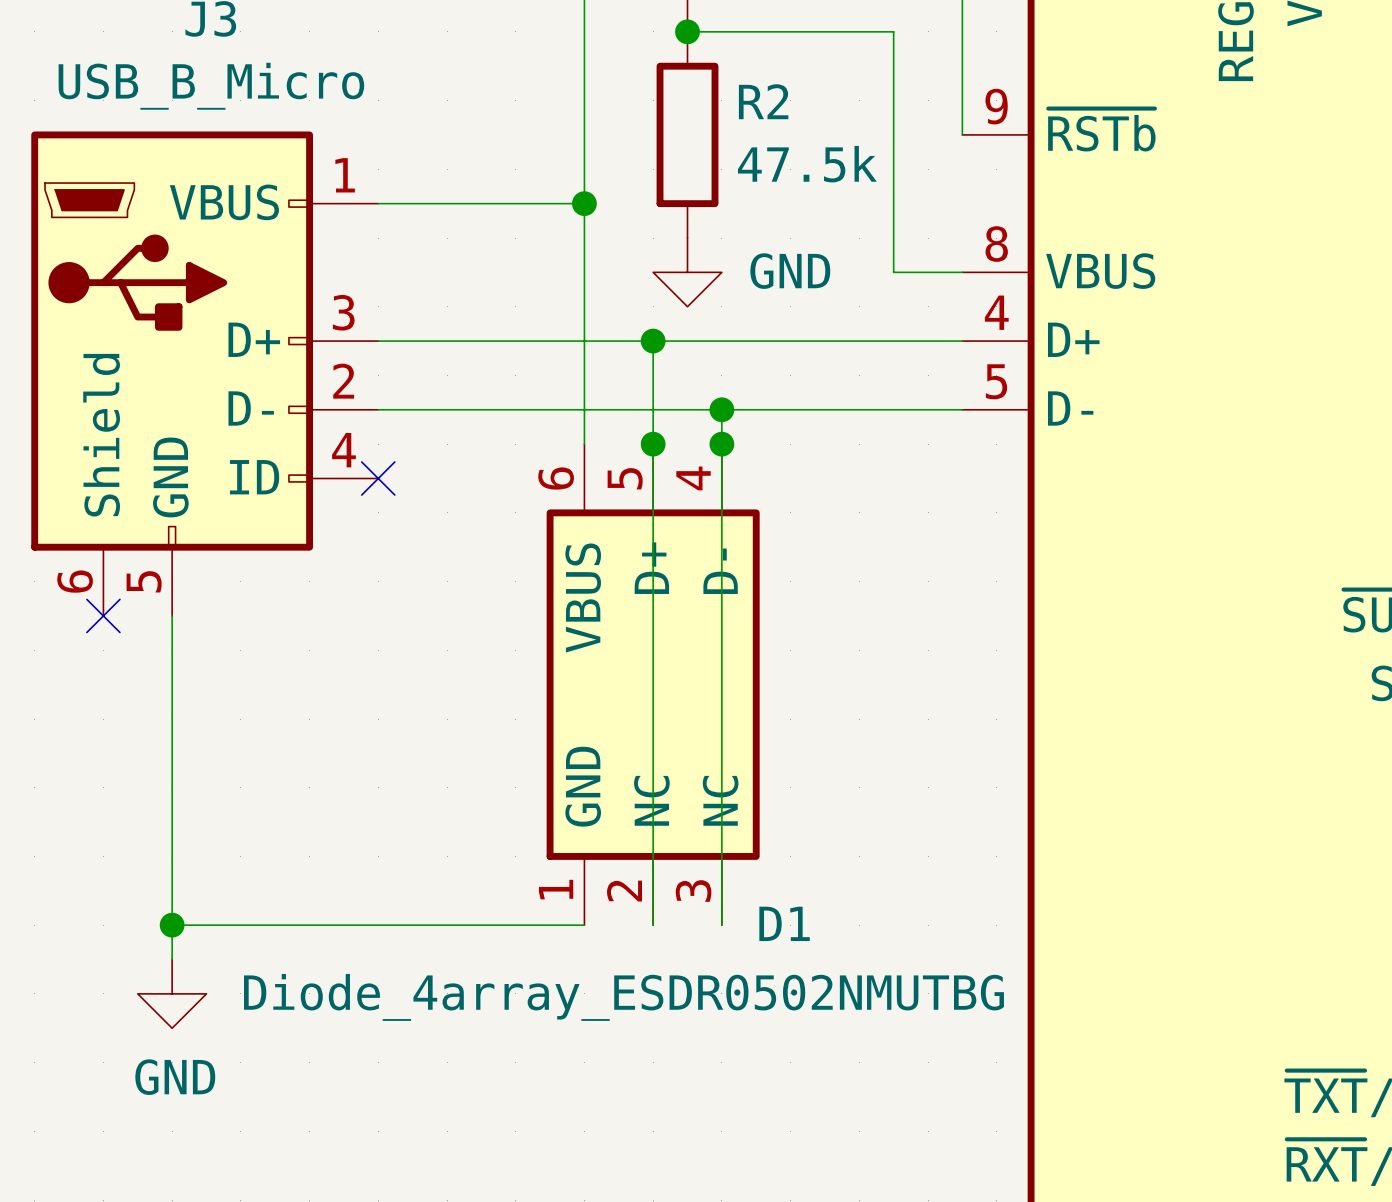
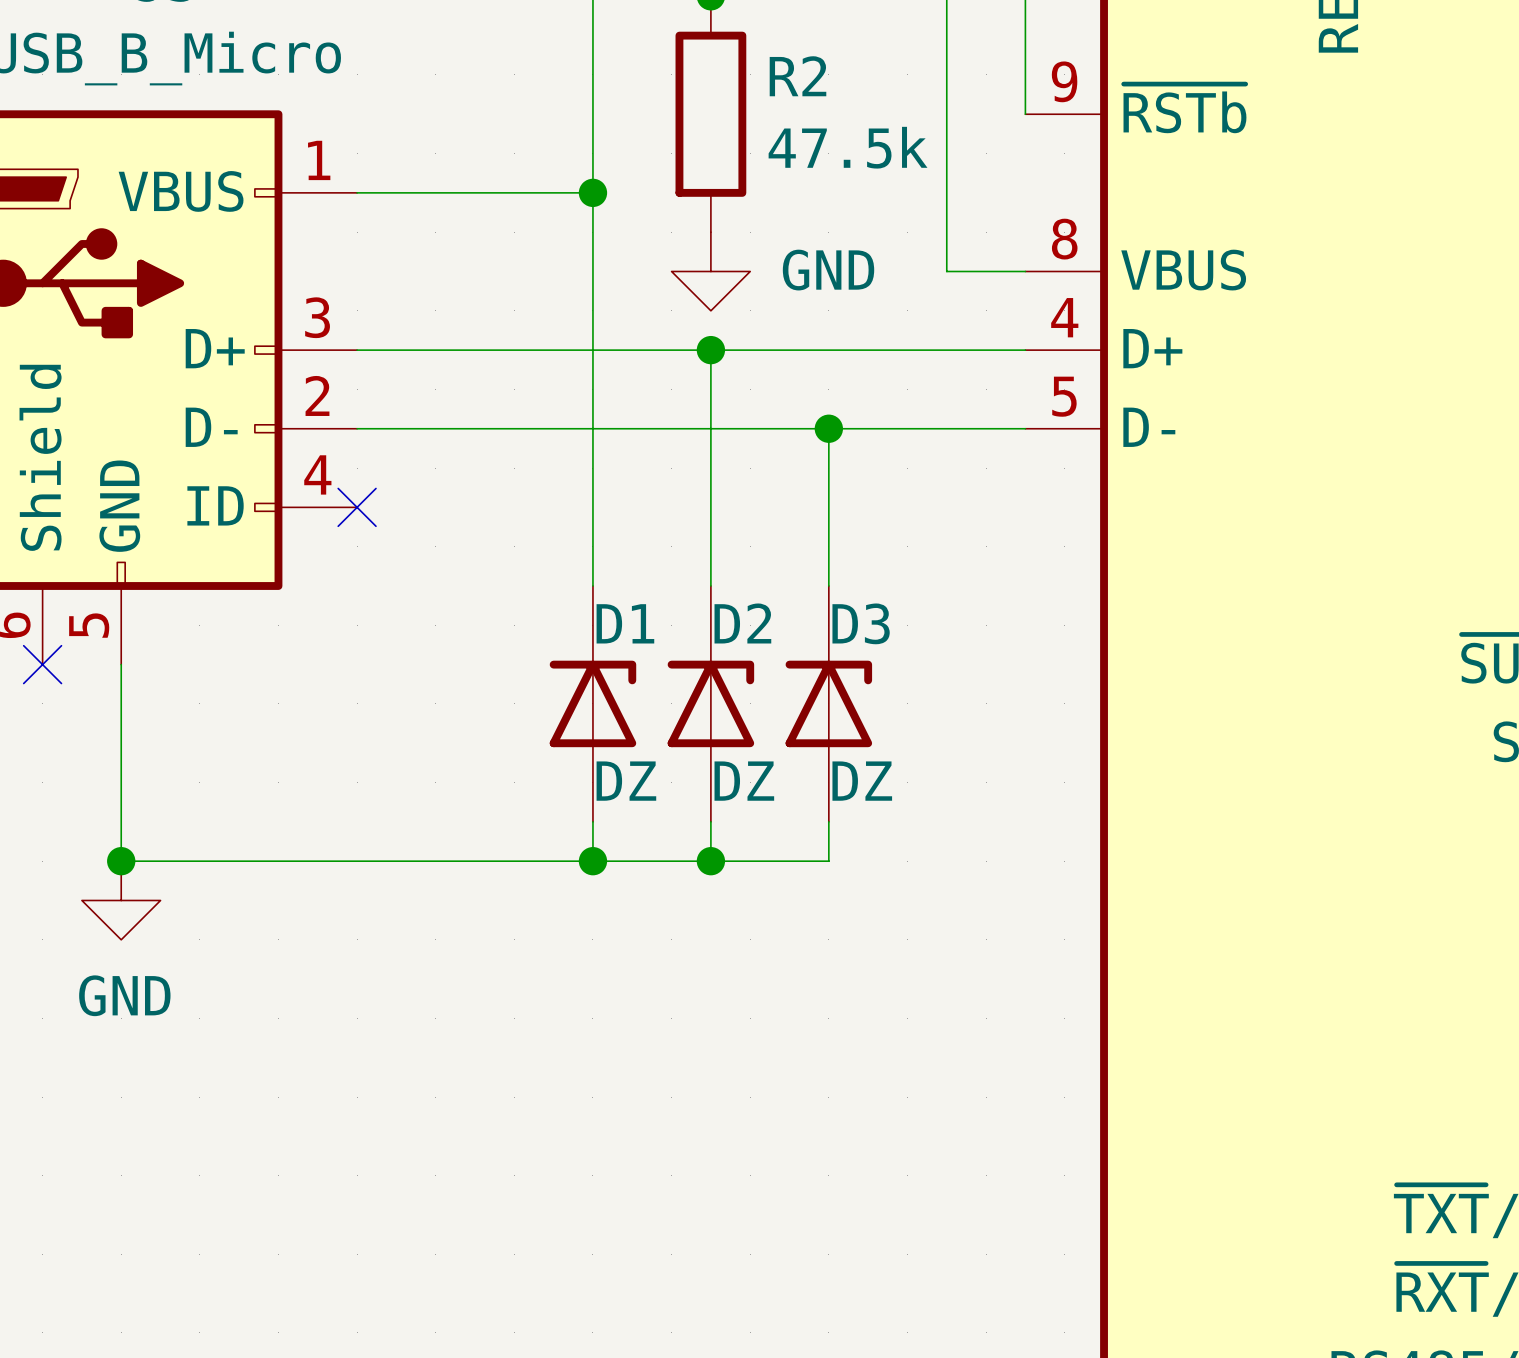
wire: (653, 341) (653, 925) -> none
junction position: (653, 341) -> (710, 350)
wire: none -> (710, 350) (710, 585)
wire: (721, 409) (721, 925) -> none
junction: (721, 409) -> none
wire: none -> (828, 428) (828, 585)
junction: none -> (828, 428)
D1 symbol: [546, 444, 760, 926] -> [549, 585, 637, 822]
junction: (653, 444) -> none
junction: (721, 444) -> none
D2: none -> DZ (710, 703)
D3: none -> DZ (828, 703)
wire: (172, 787) (172, 959) -> (121, 861) (828, 861) (828, 821)
junction: none -> (592, 861)
junction: none -> (710, 861)
D1 name position: D1 (784, 923) -> D1 (625, 623)
wire: (172, 925) (584, 925) -> none
junction position: (172, 925) -> (121, 861)
power symbol position: GND (172, 993) -> GND (121, 900)
D1 value: Diode_4array_ESDR0502NMUTBG (623, 997) -> DZ (626, 781)

